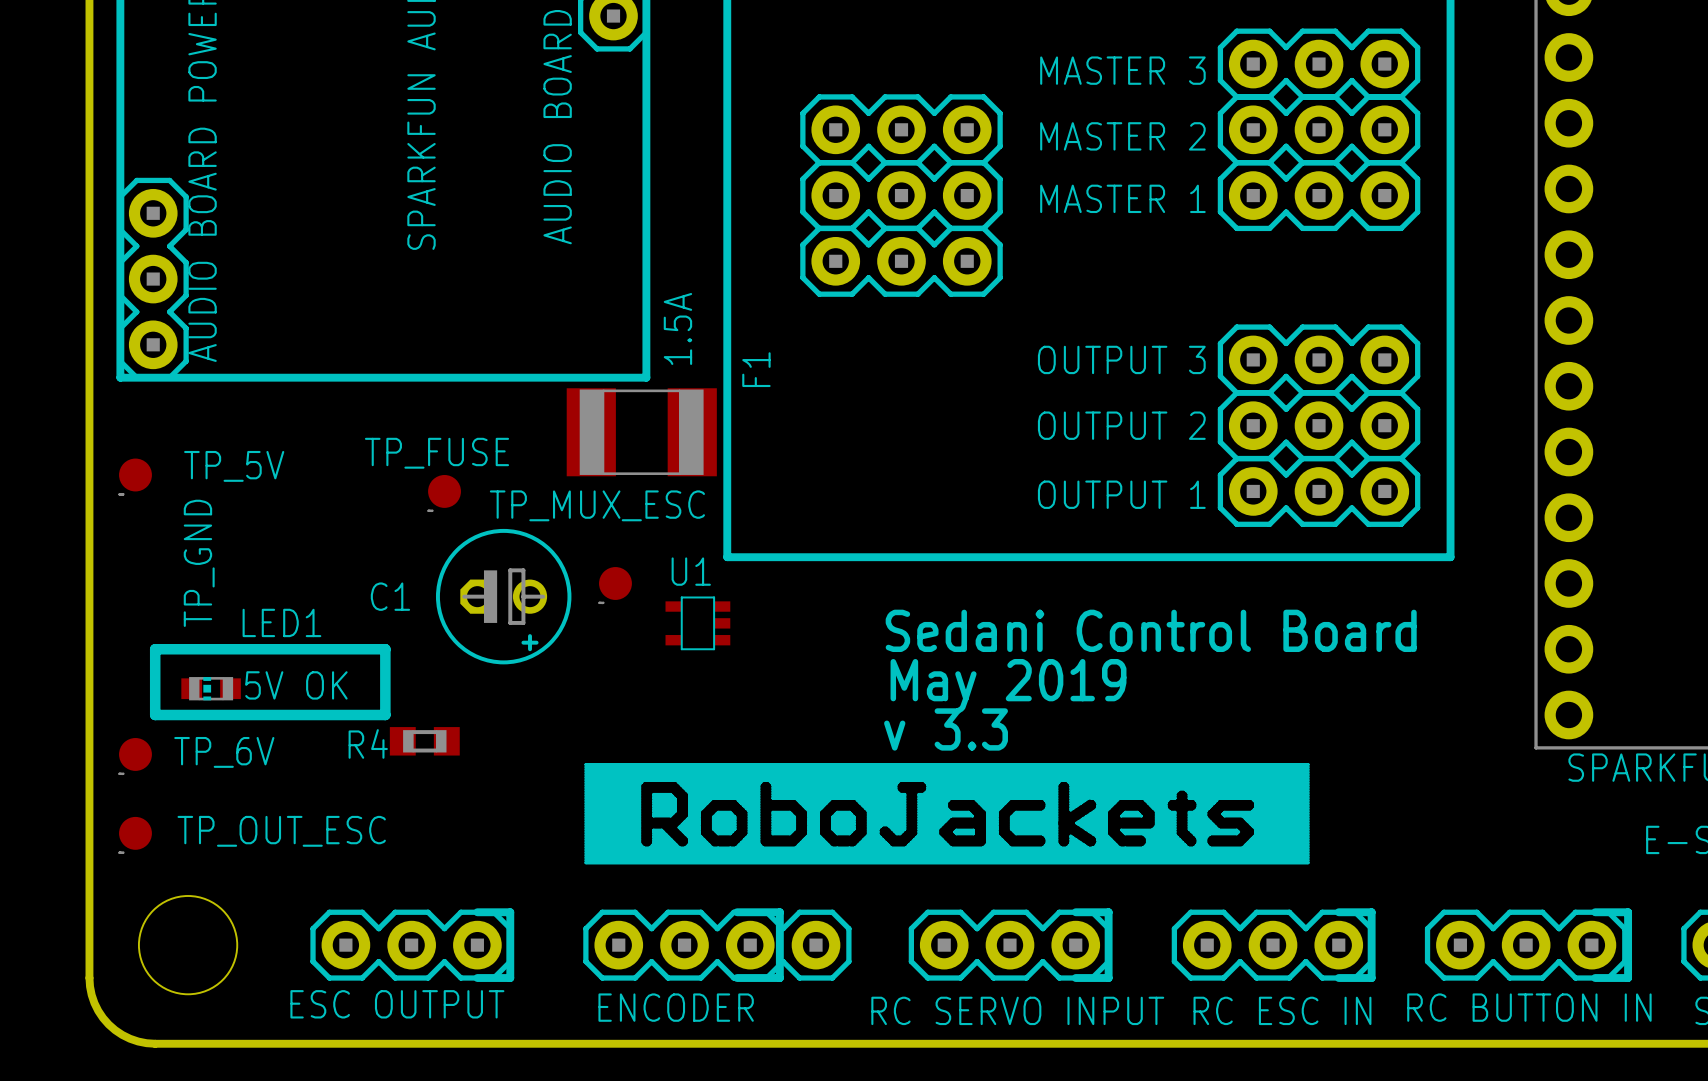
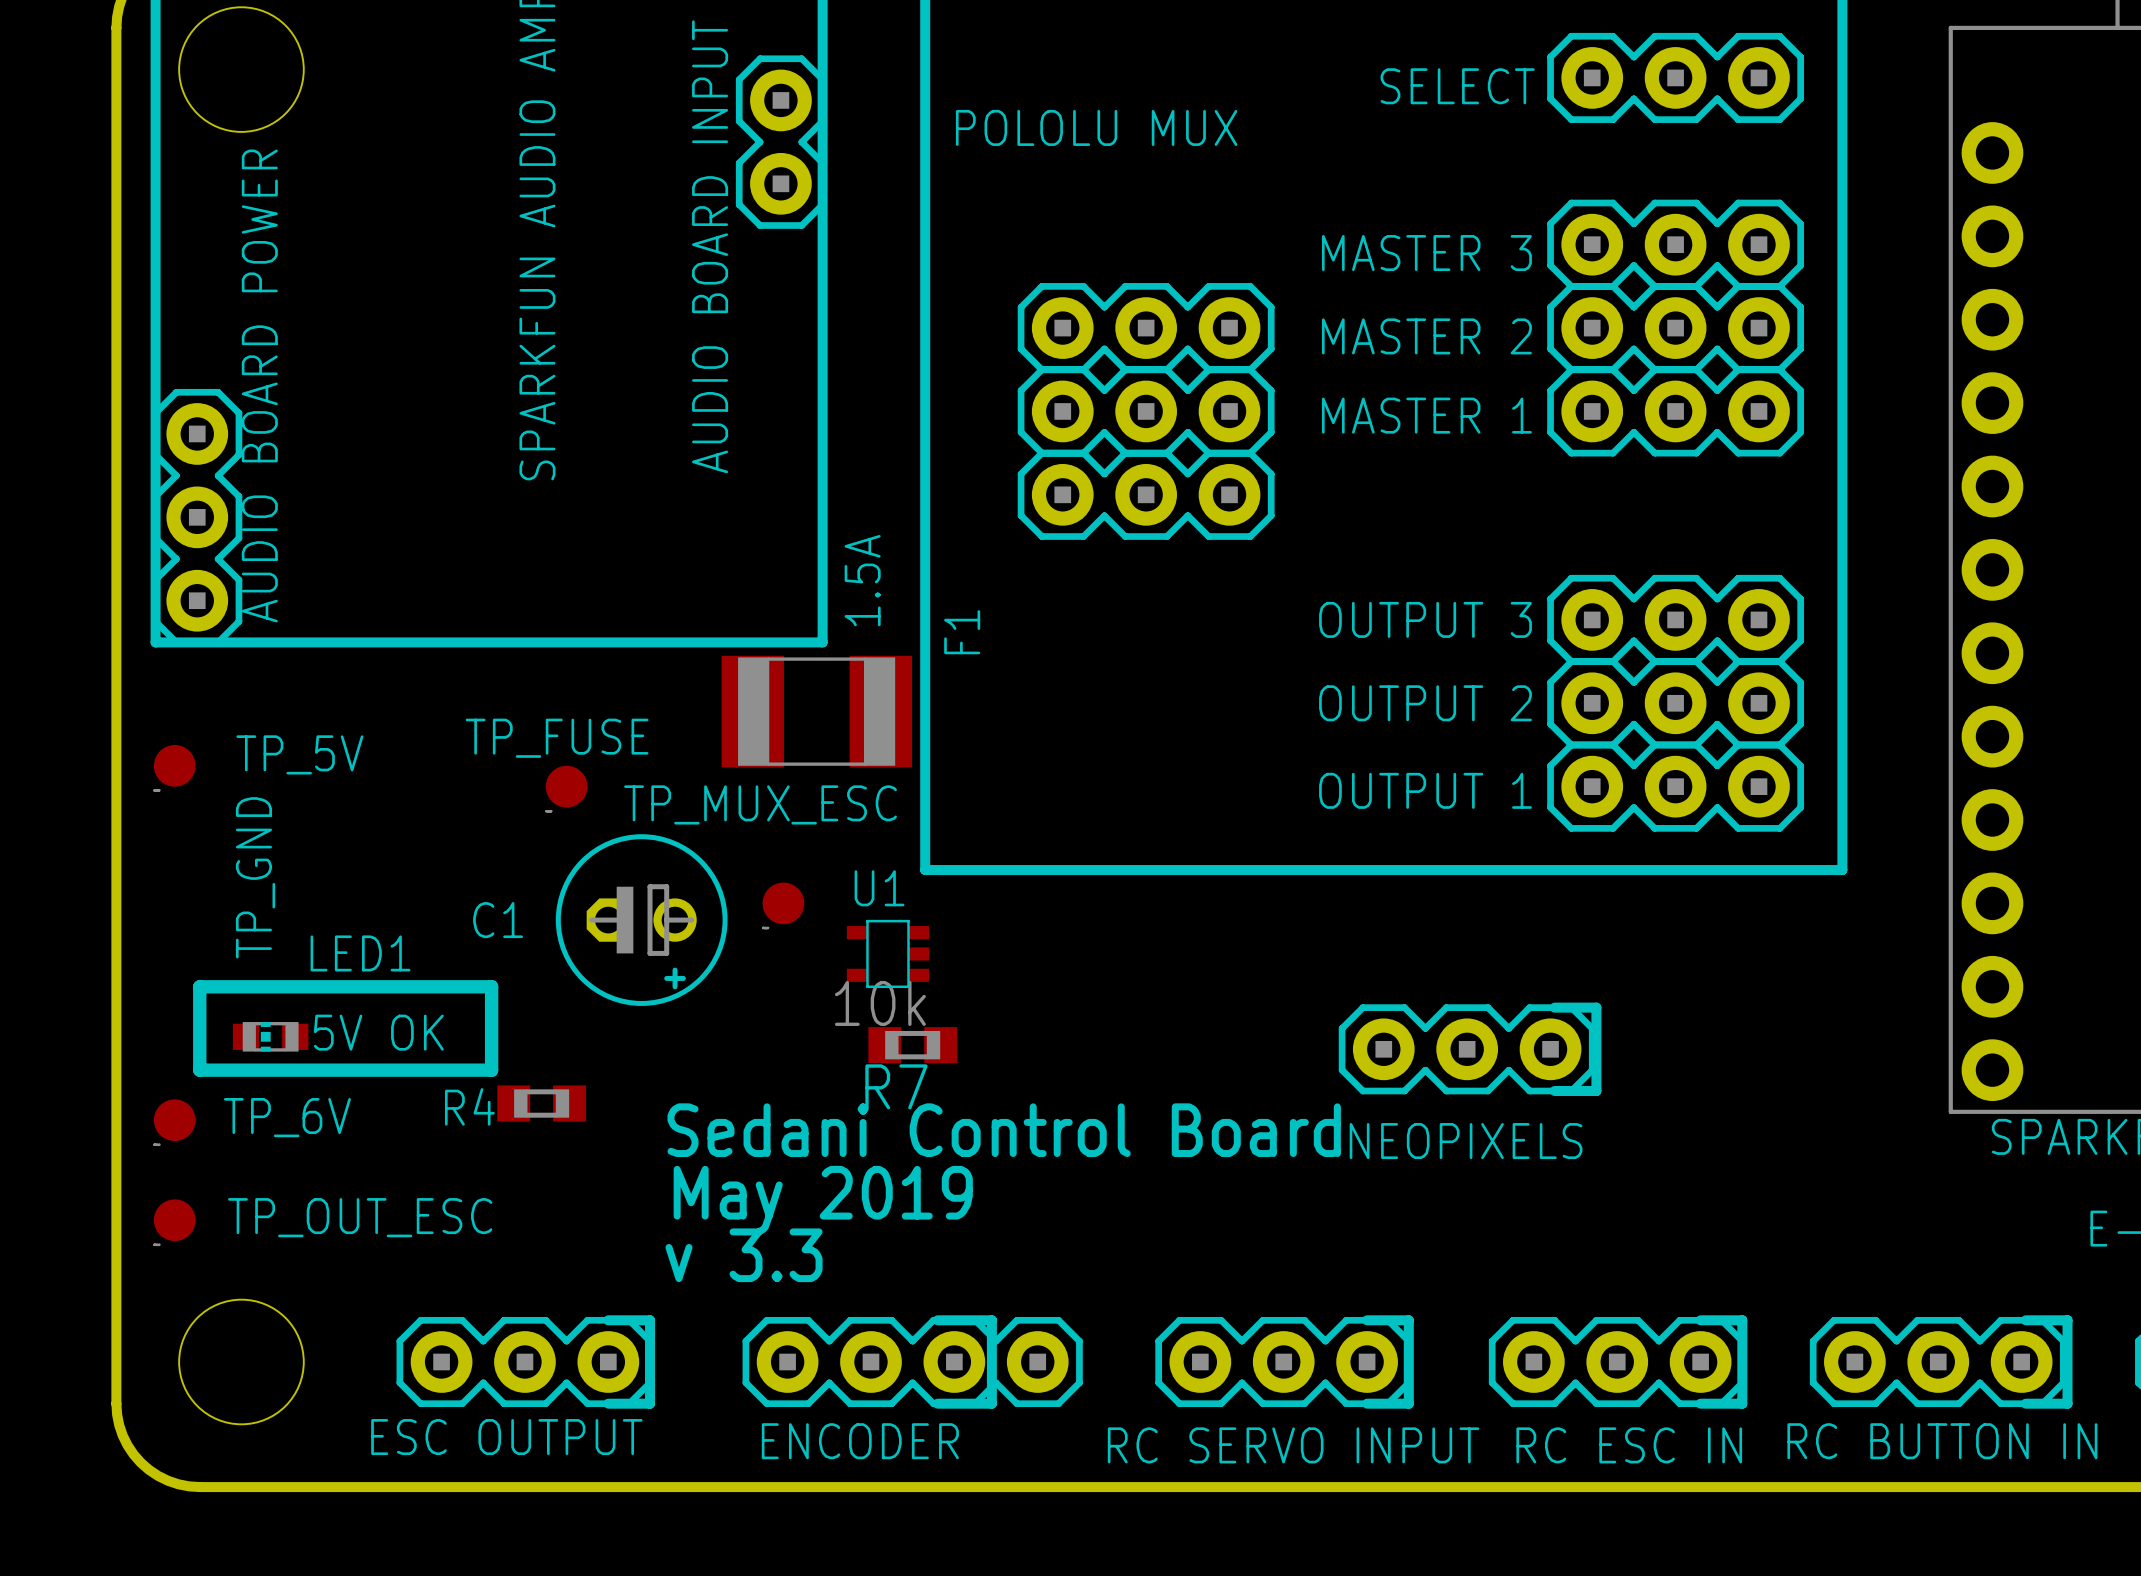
text position: Sedani Control Board (1151, 630) -> Sedani Control Board (1004, 1130)
line: none -> (1554, 1007) (1596, 1007) (1596, 1091) (1554, 1091)
text position: May 2019 (1008, 686) -> May 2019 (823, 1200)
R7: none -> 10k (912, 1045)
part: none -> NEOPIXELS (1467, 1049)
text position: v 3.3 (946, 729) -> v 3.3 (744, 1255)
drawing: [584, 763, 1310, 865] -> none

